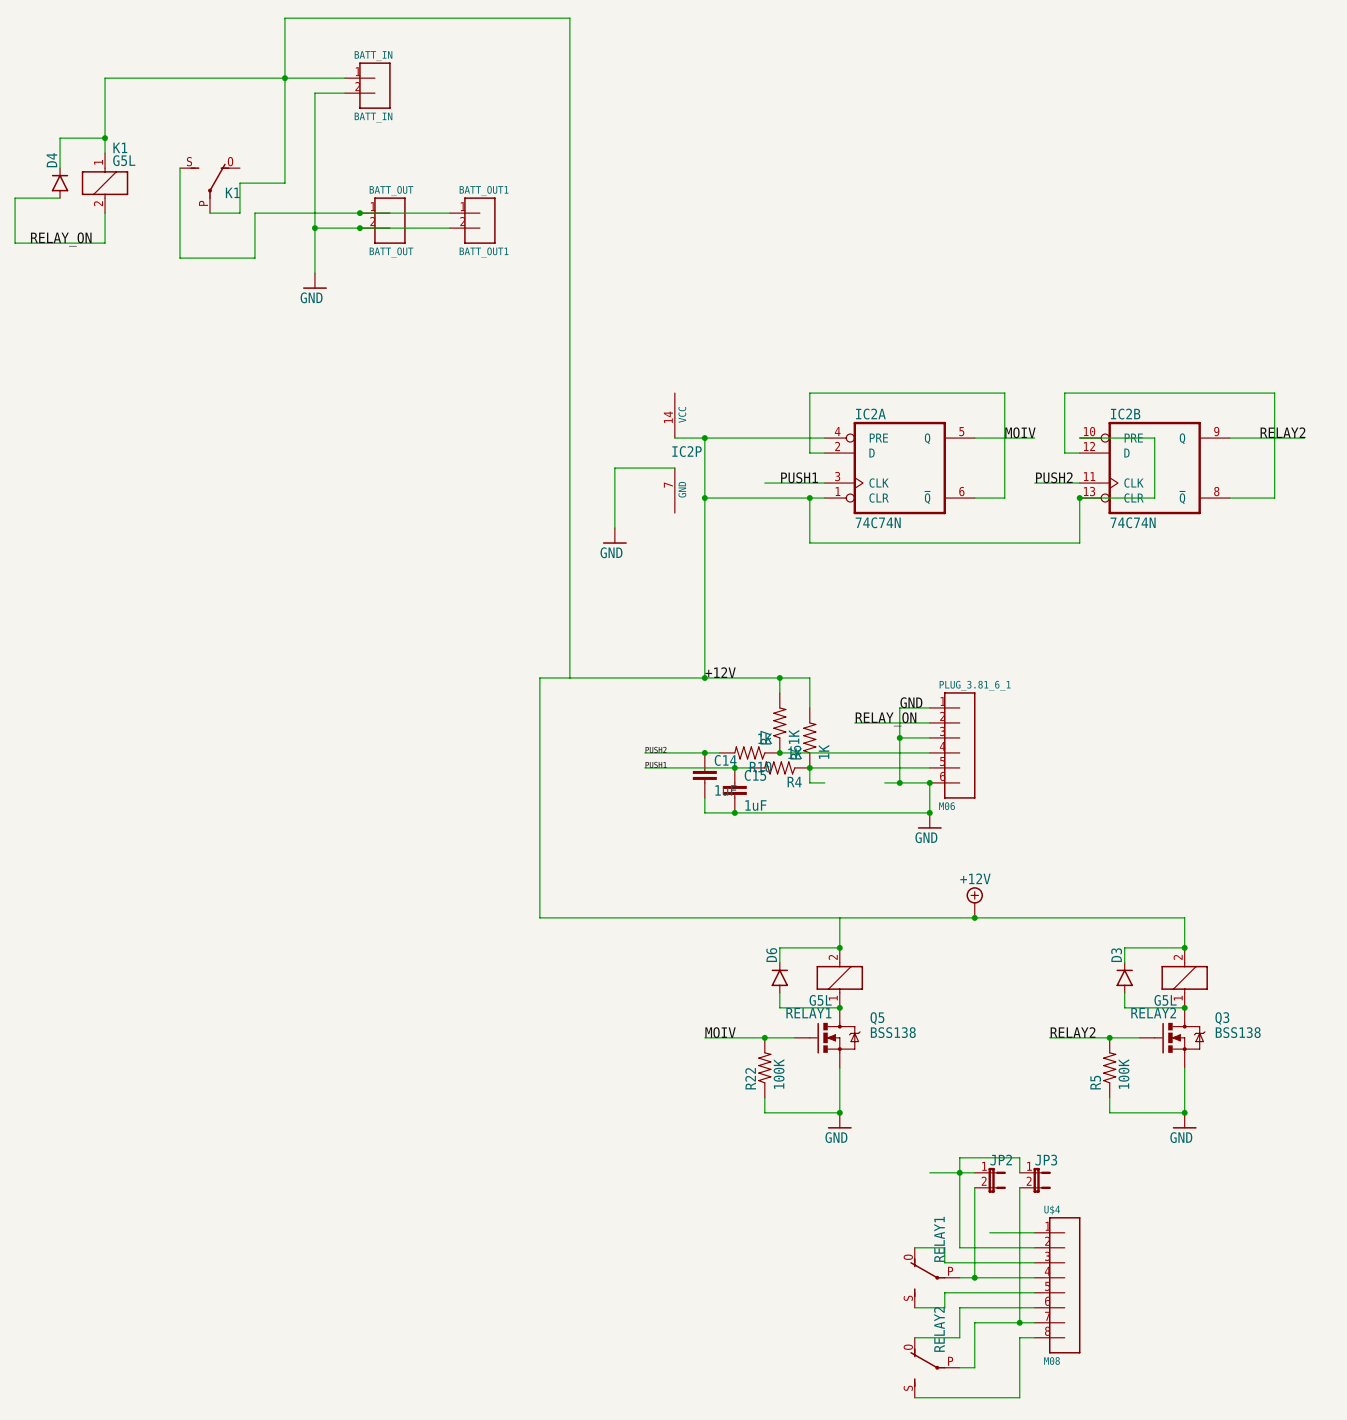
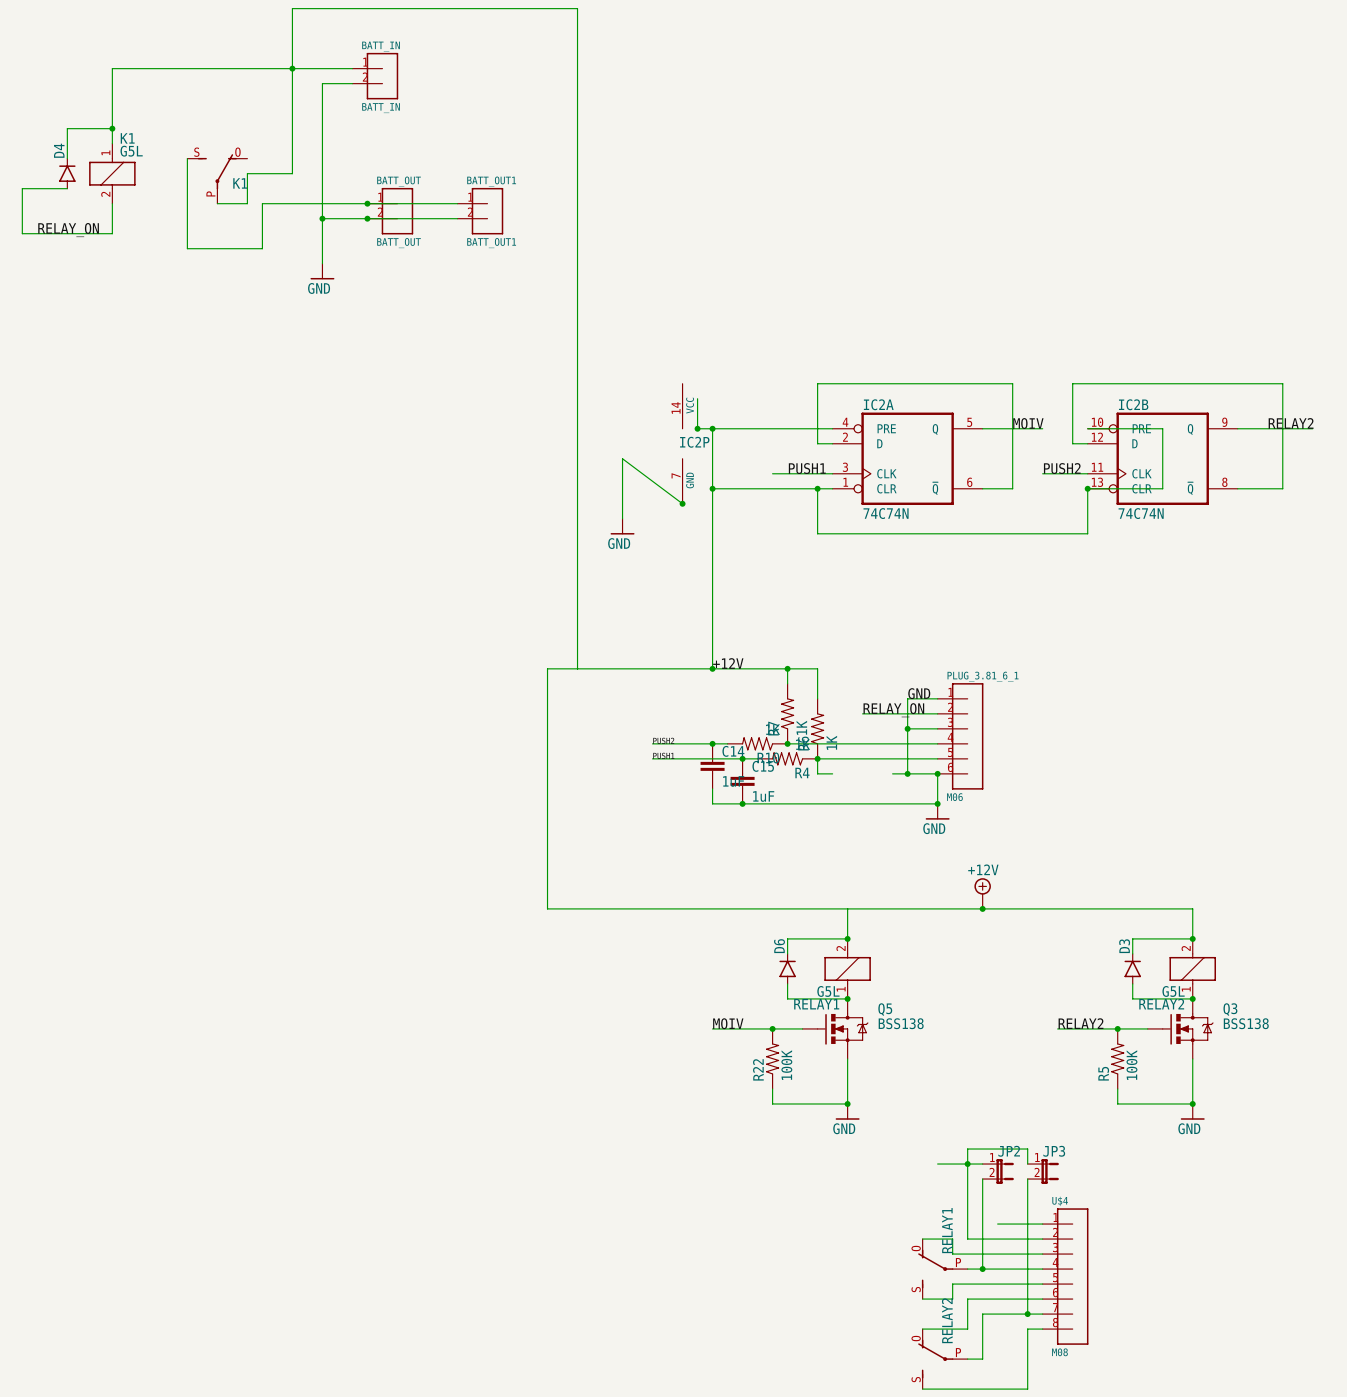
wire: (674, 438) (689, 438) -> (697, 398) (697, 428)
junction: none -> (697, 428)
wire: (614, 468) (674, 468) -> (622, 458) (682, 503)
junction: none -> (682, 503)

